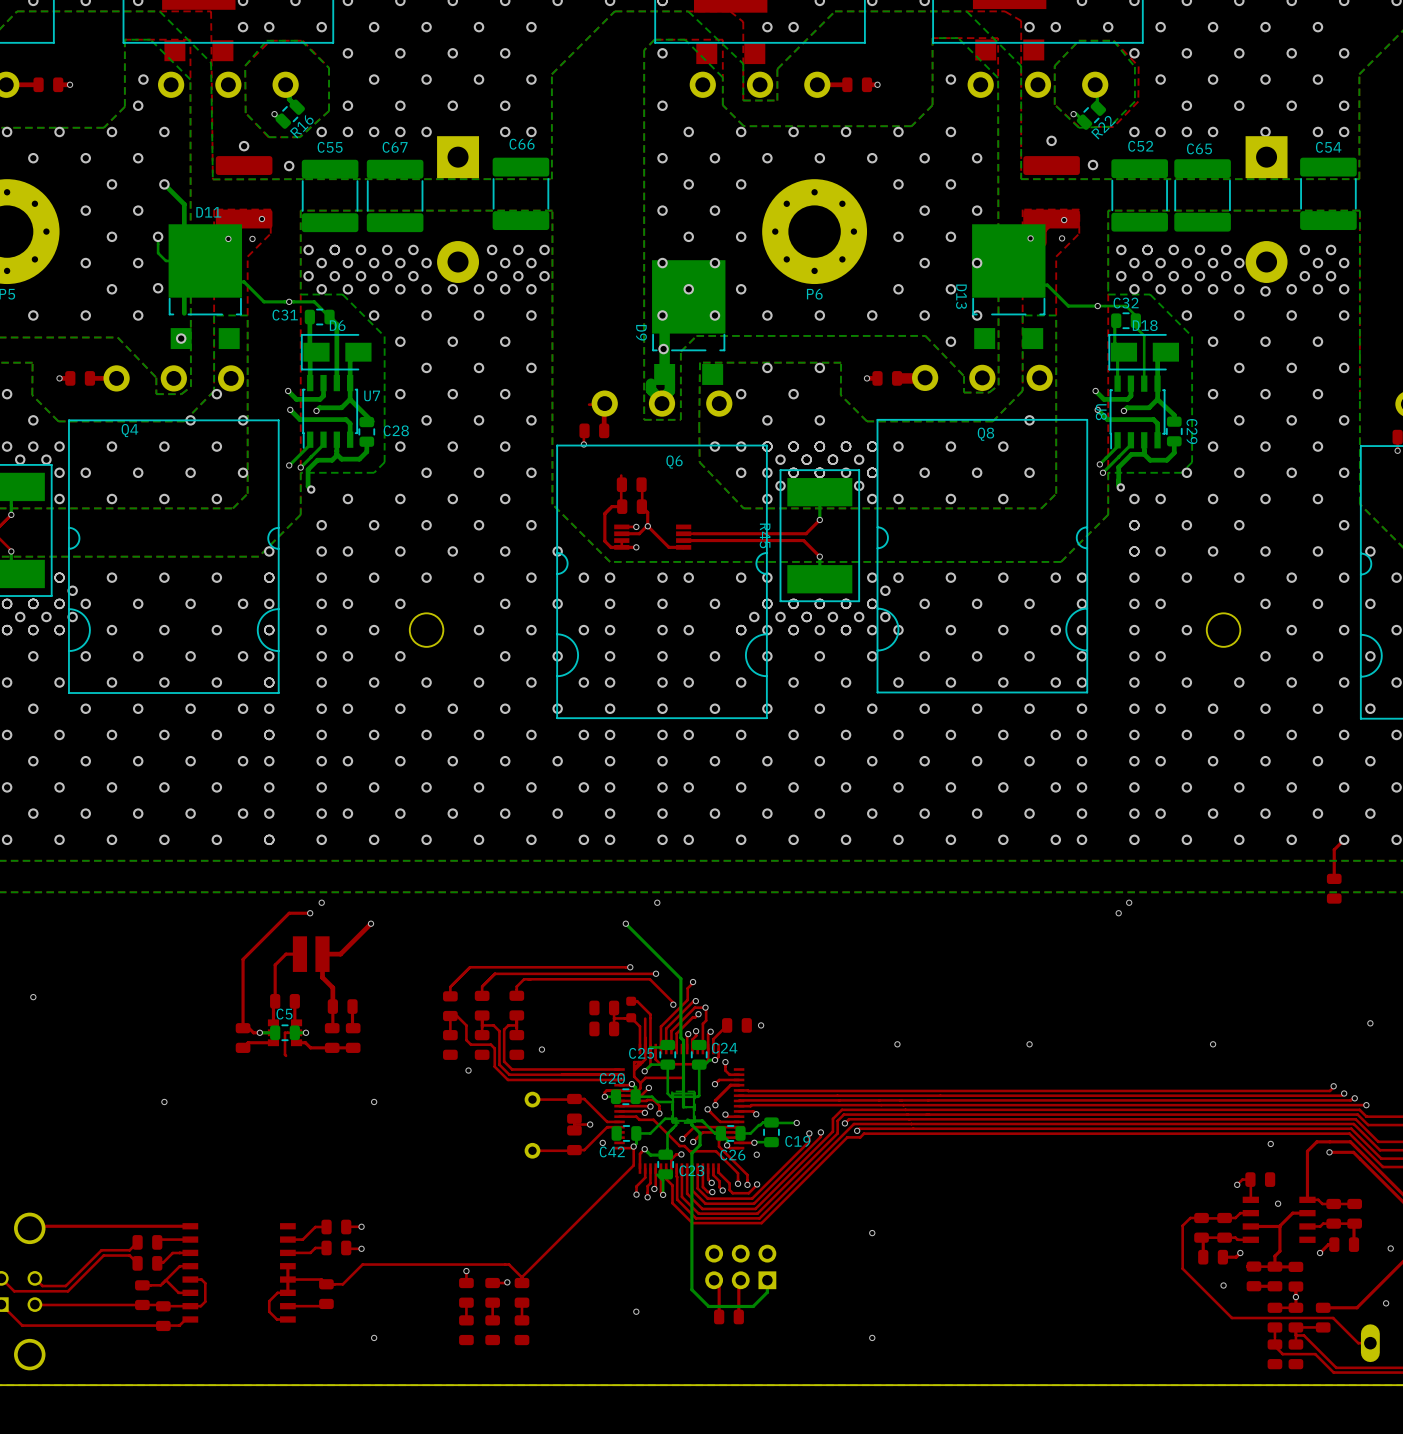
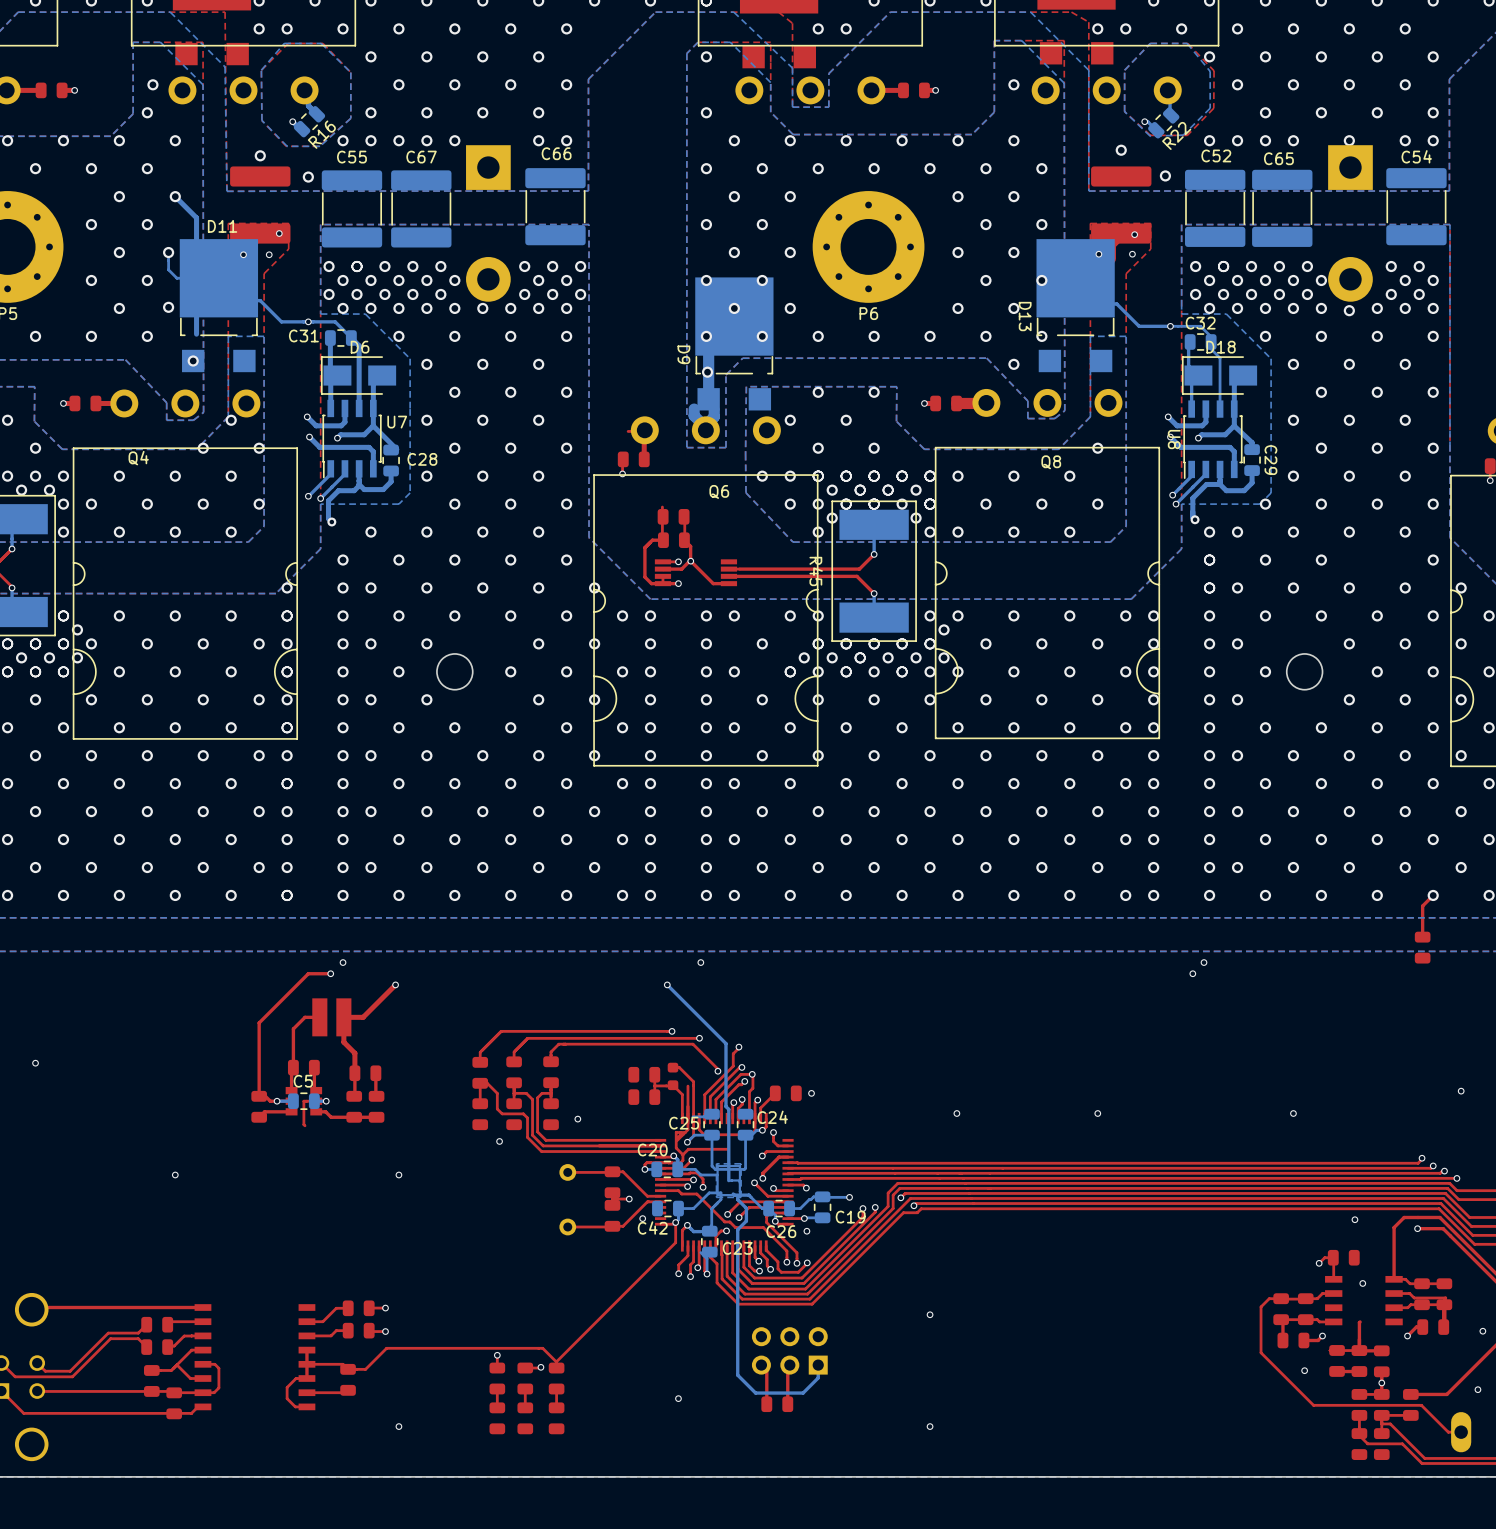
top track: (1307, 1213) (1292, 1213) (1279, 1226) (1279, 1251) (1274, 1256) -> (1360, 1321) (1359, 1339)
top track: none -> (1394, 1293) (1409, 1293) (1414, 1298) (1445, 1298) (1444, 1320)
top track: (1279, 1226) (1255, 1226) -> none

